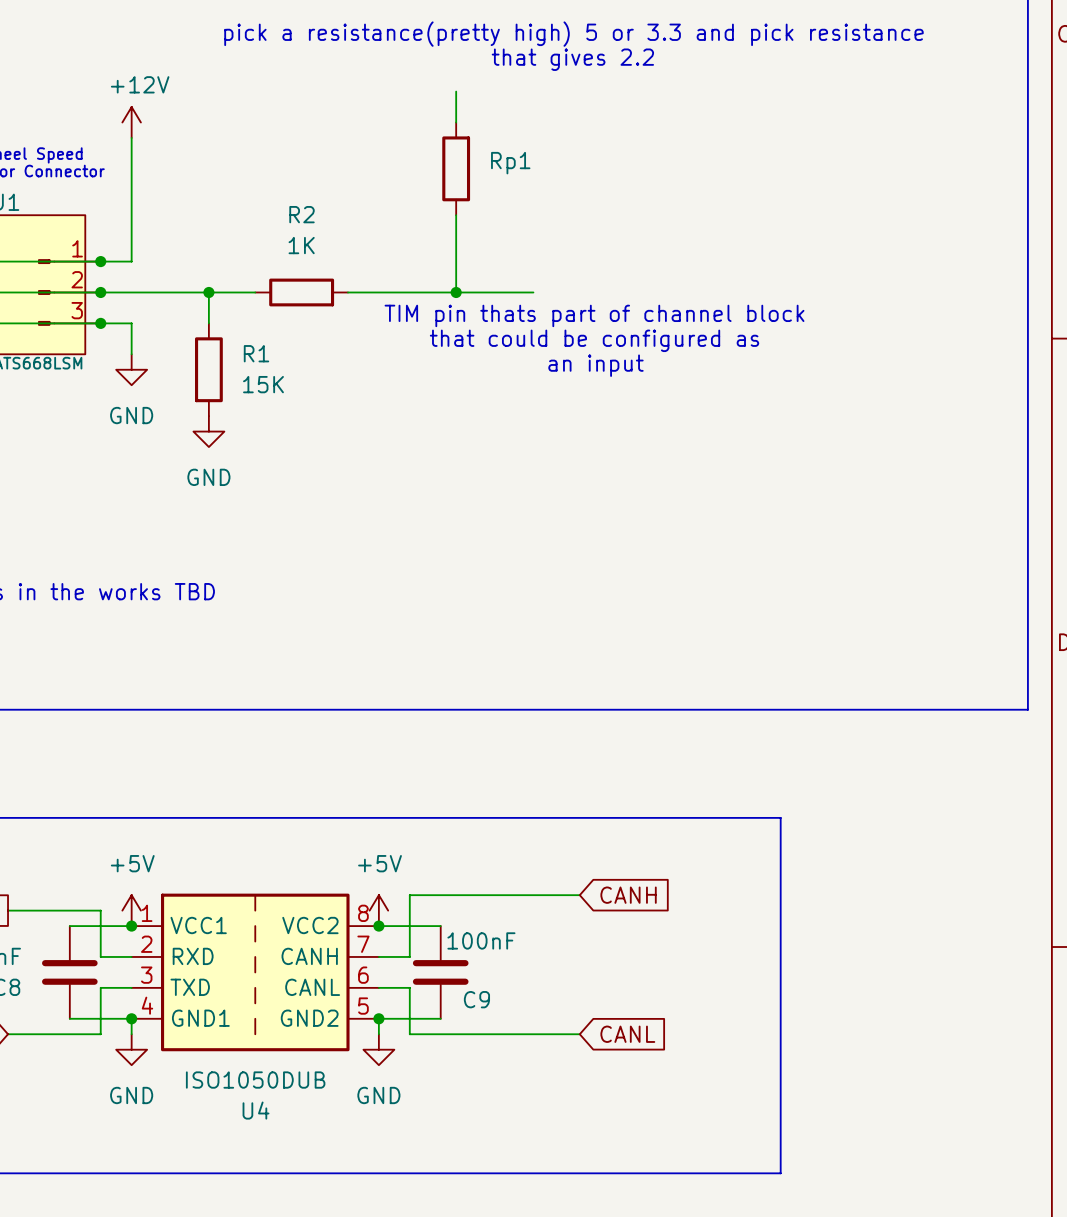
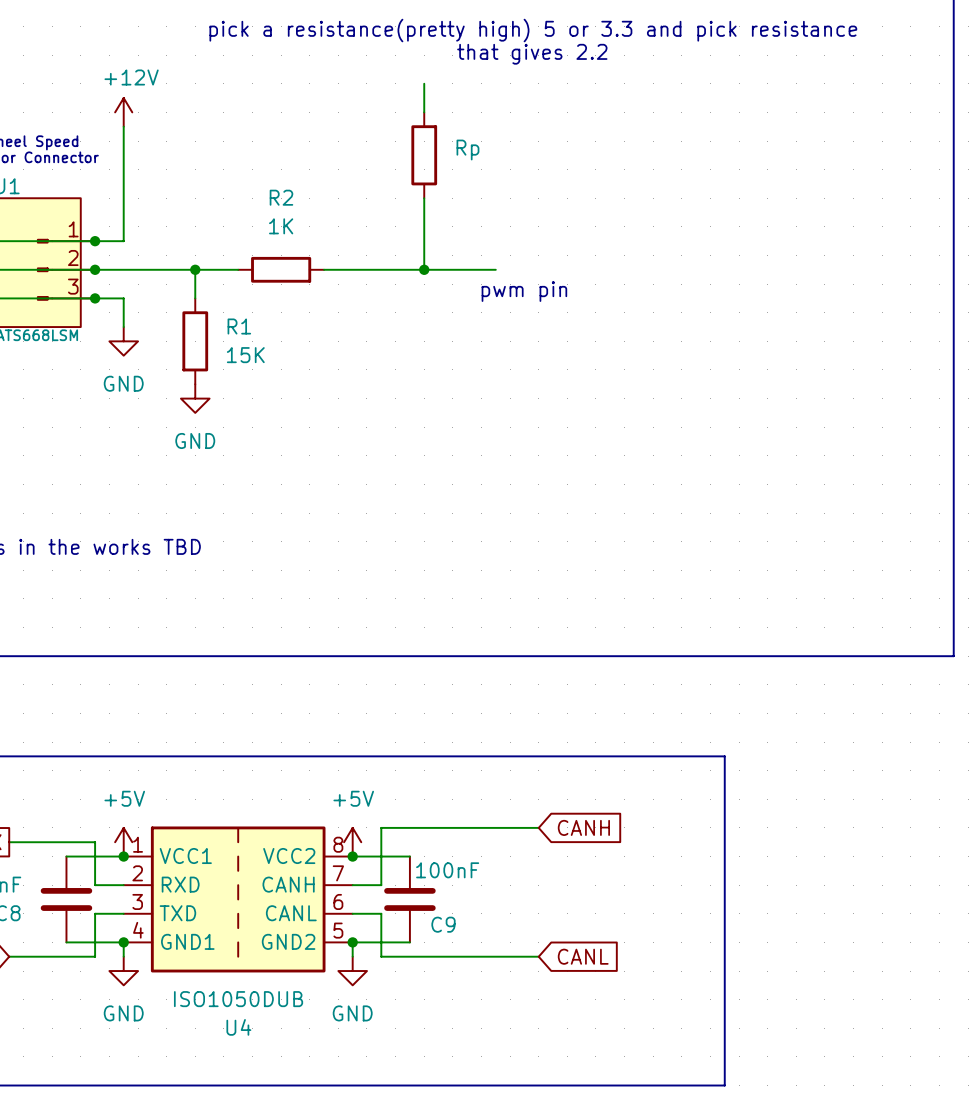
Rp1 name: Rp1 (510, 163) -> Rp (467, 150)
text: none -> pwm pin (524, 291)
text: TIM pin thats part of channel block (594, 315) -> none
text: that could be configured as (594, 340) -> none
text: an input (595, 365) -> none

